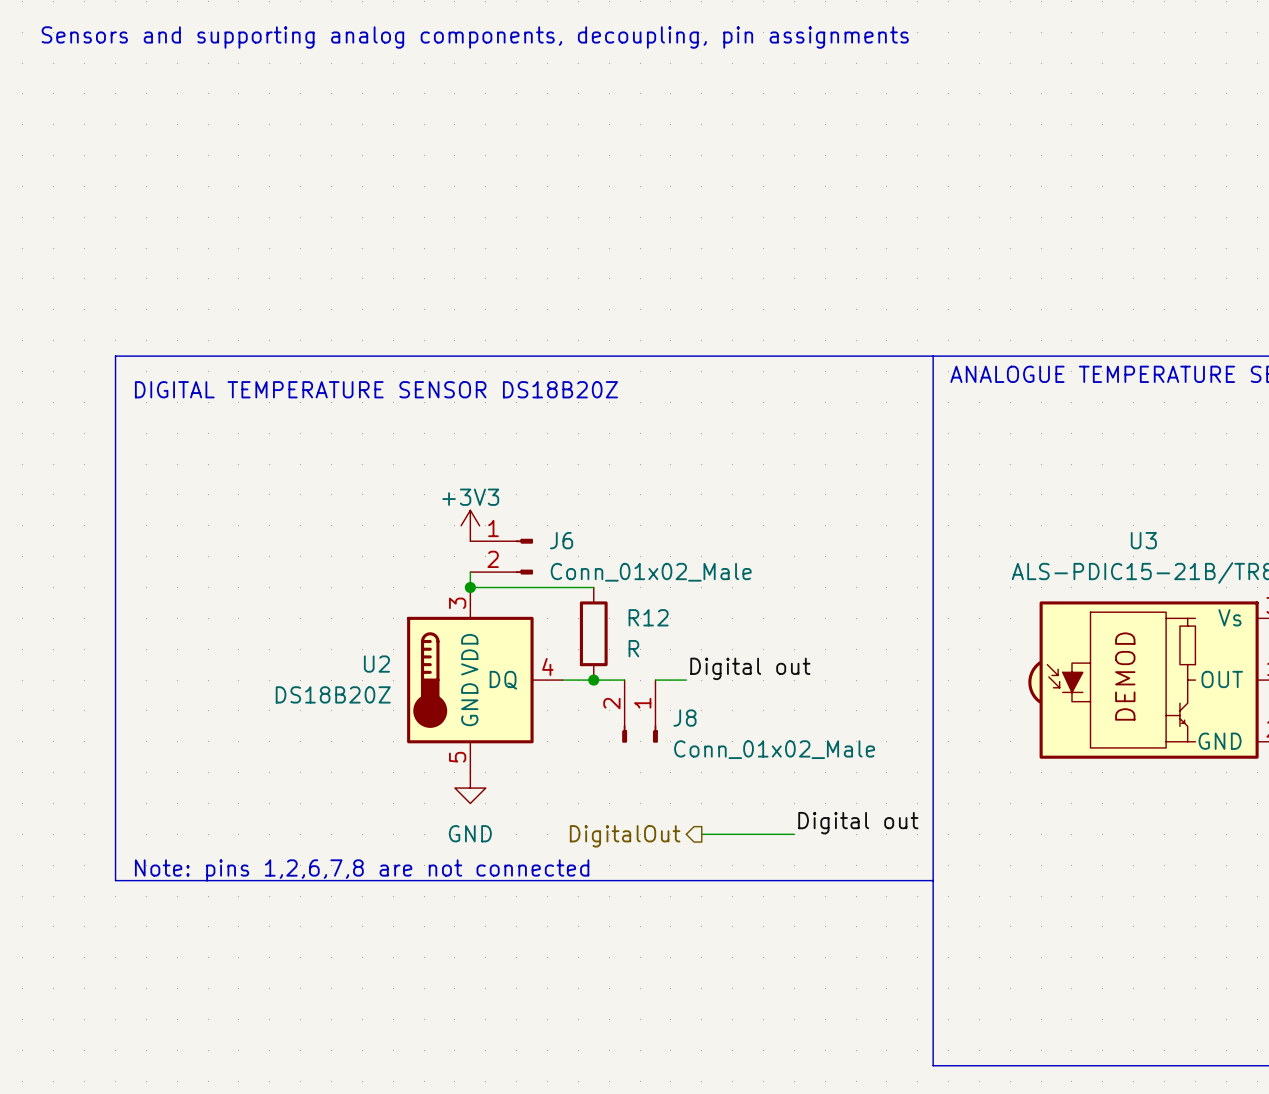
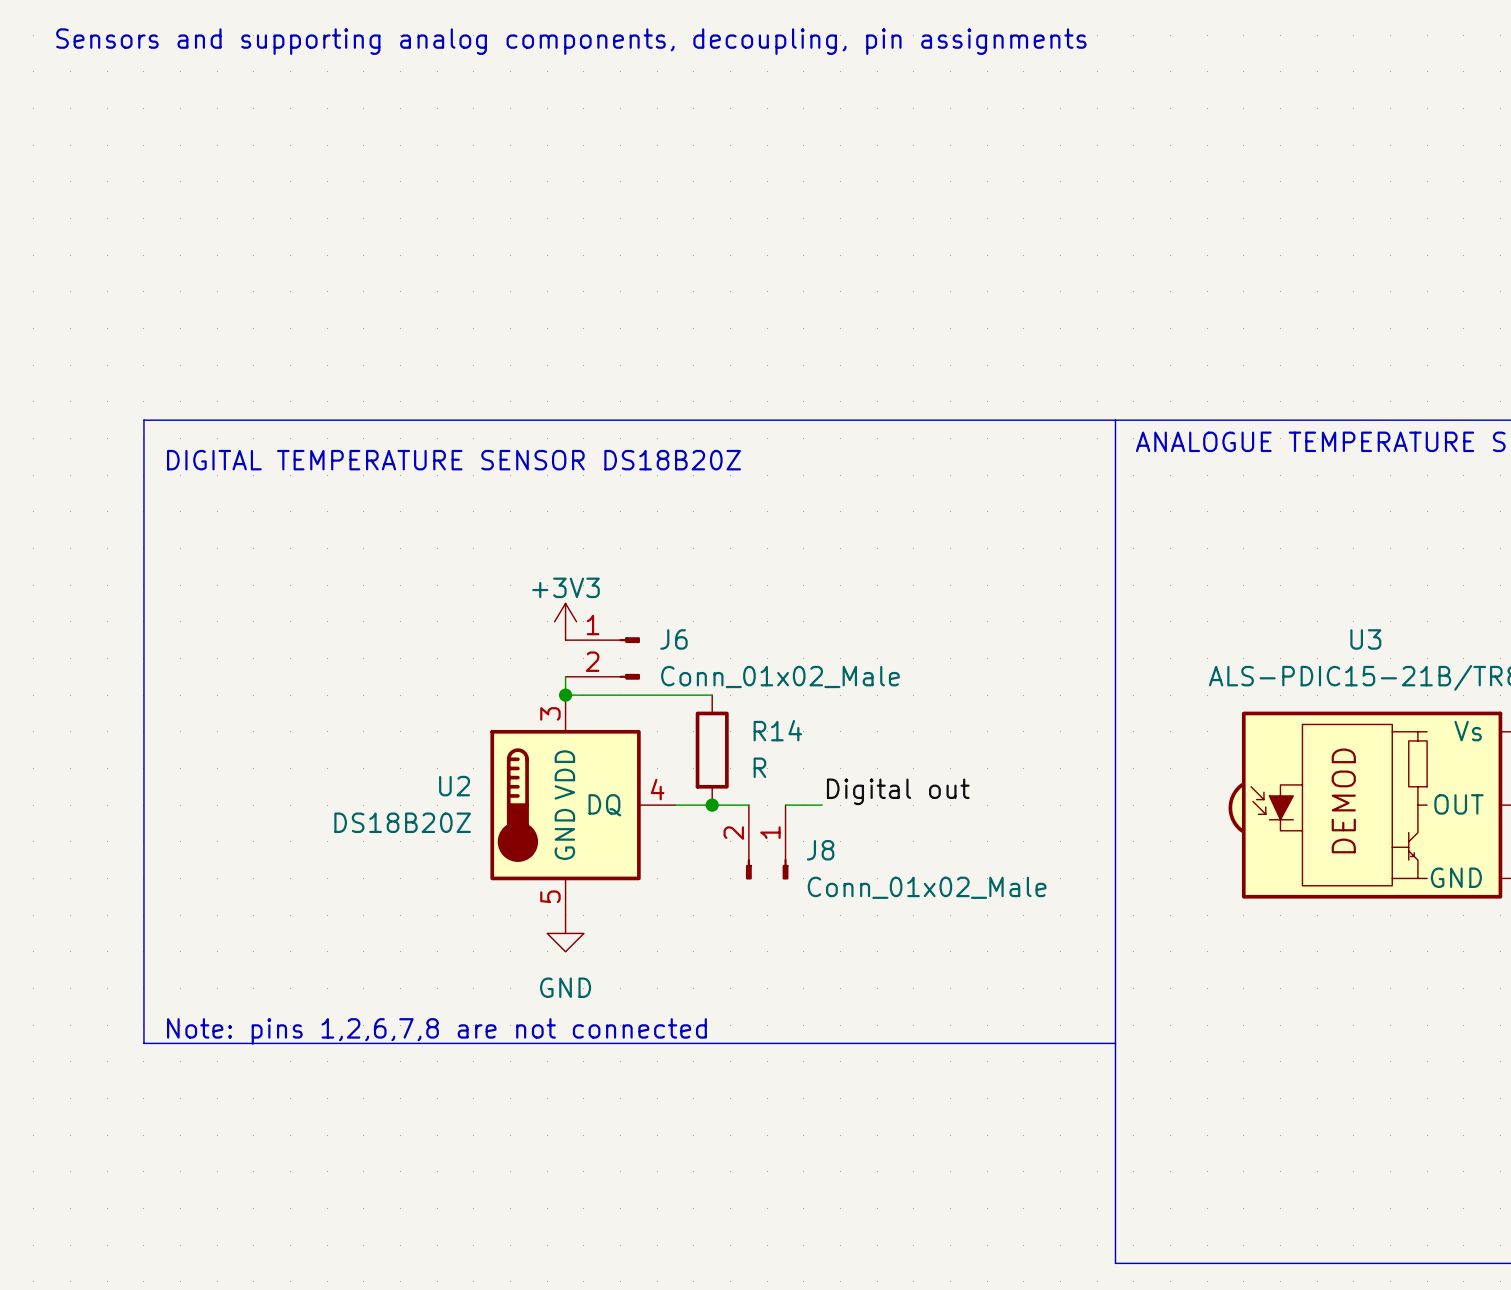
R12 name: R12 (648, 617) -> R14 (777, 730)
label: Digital out (858, 823) -> none
wire: (701, 834) (794, 834) -> none
hierarchical label: DigitalOut (625, 836) -> none

